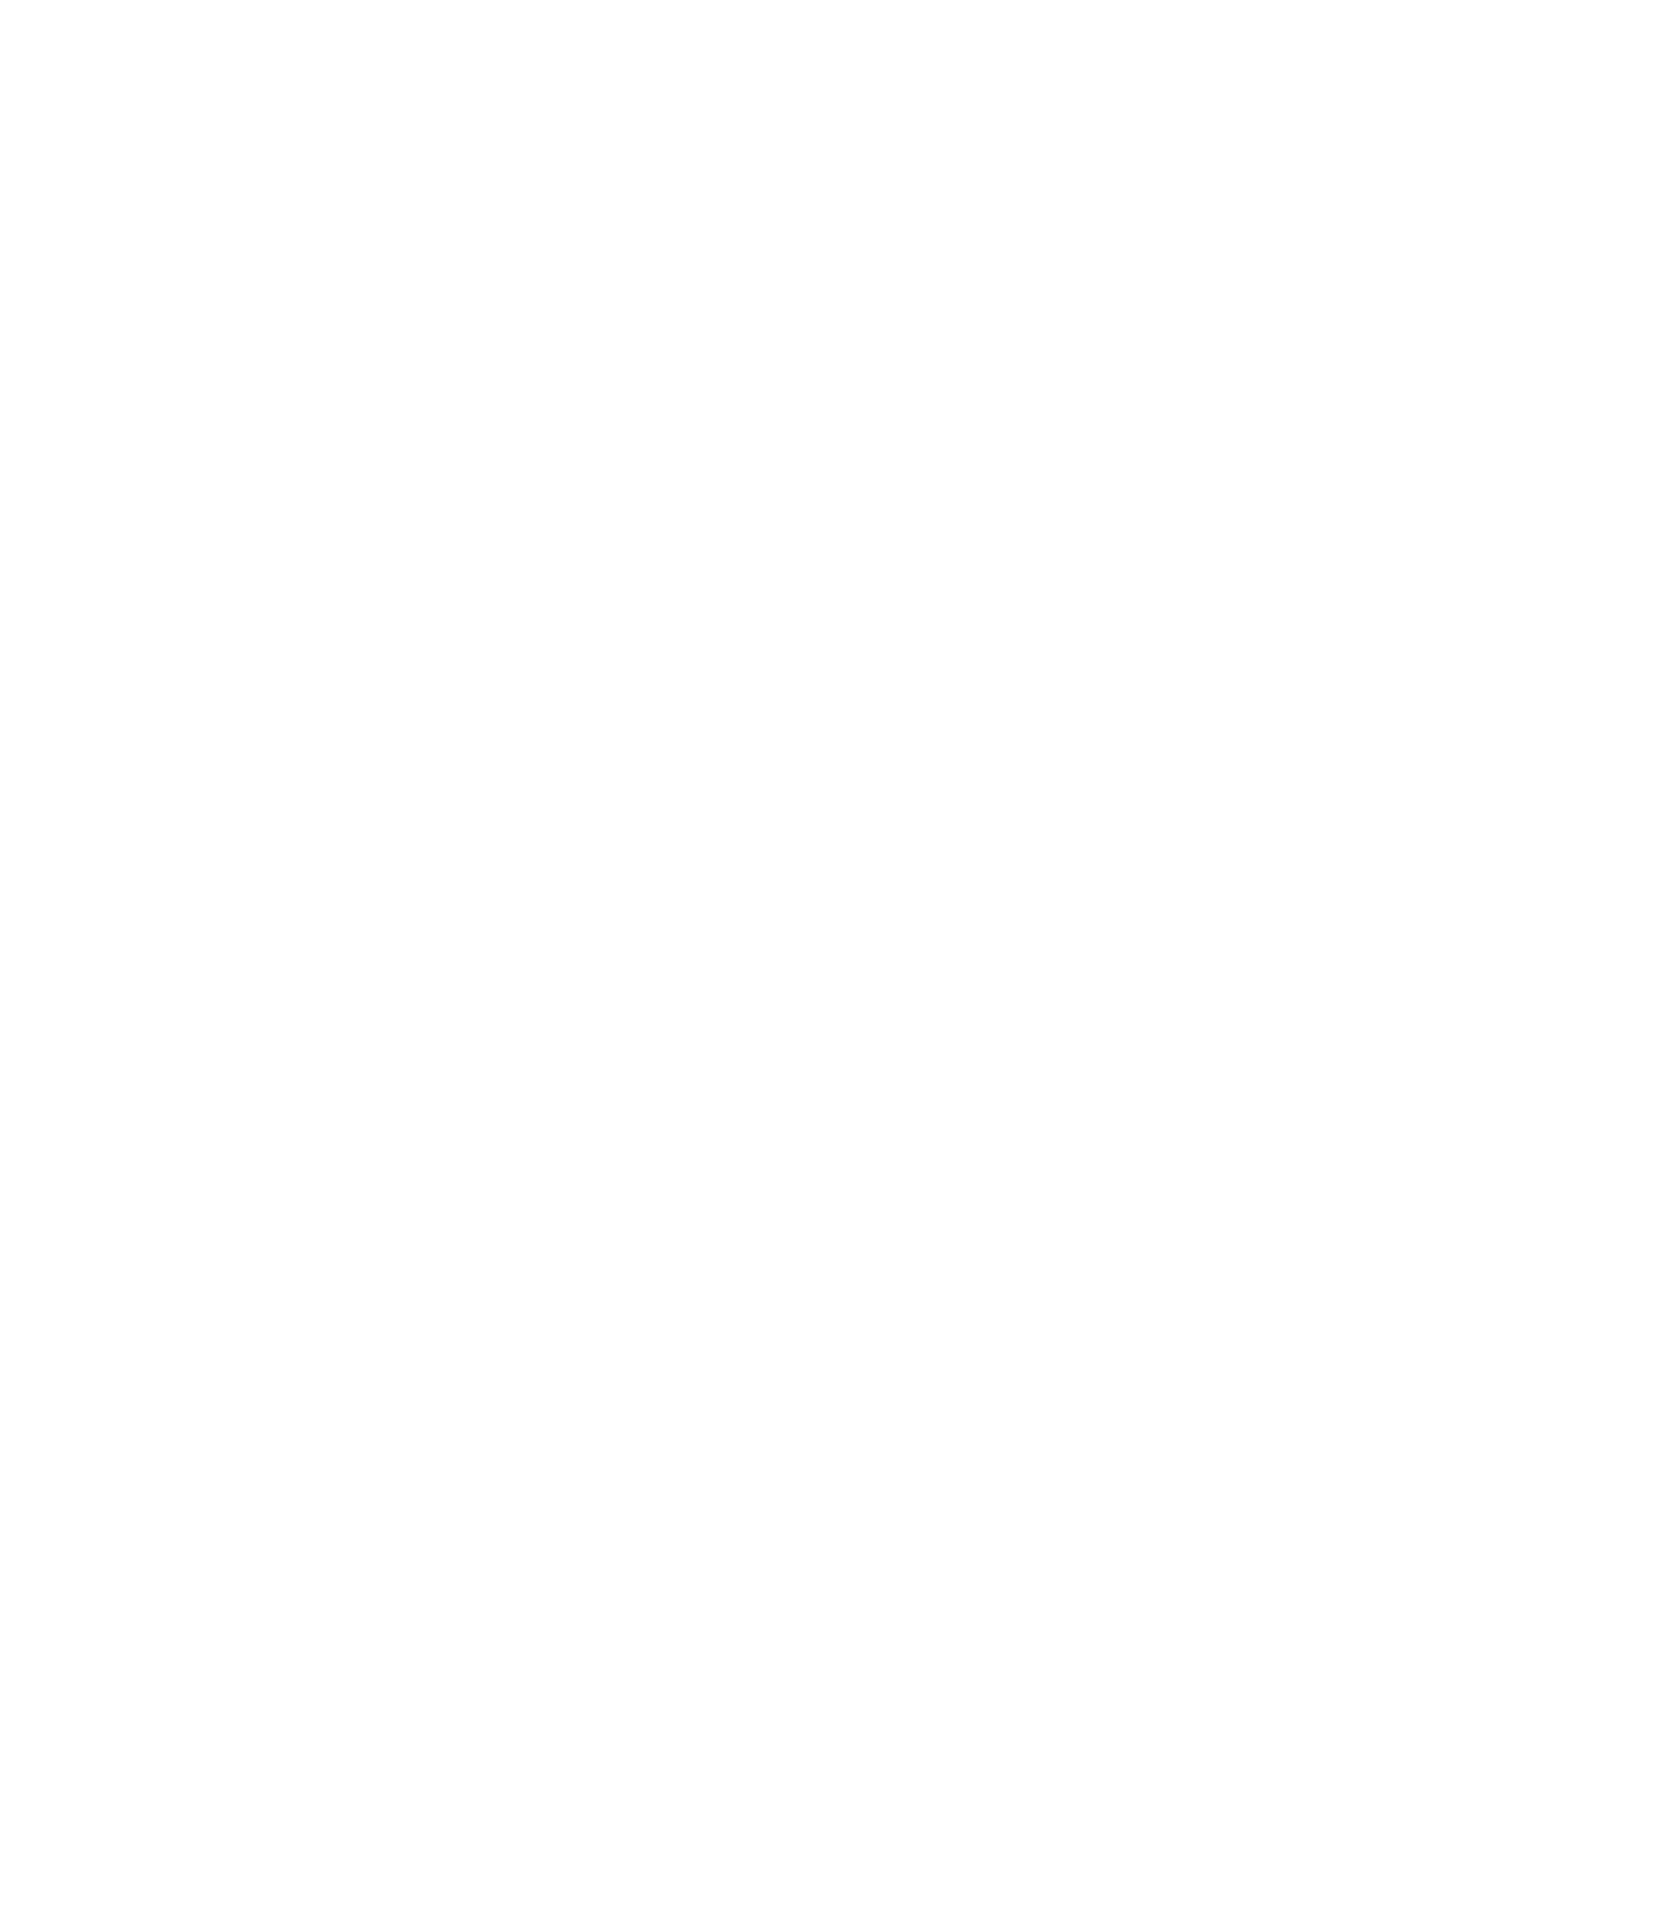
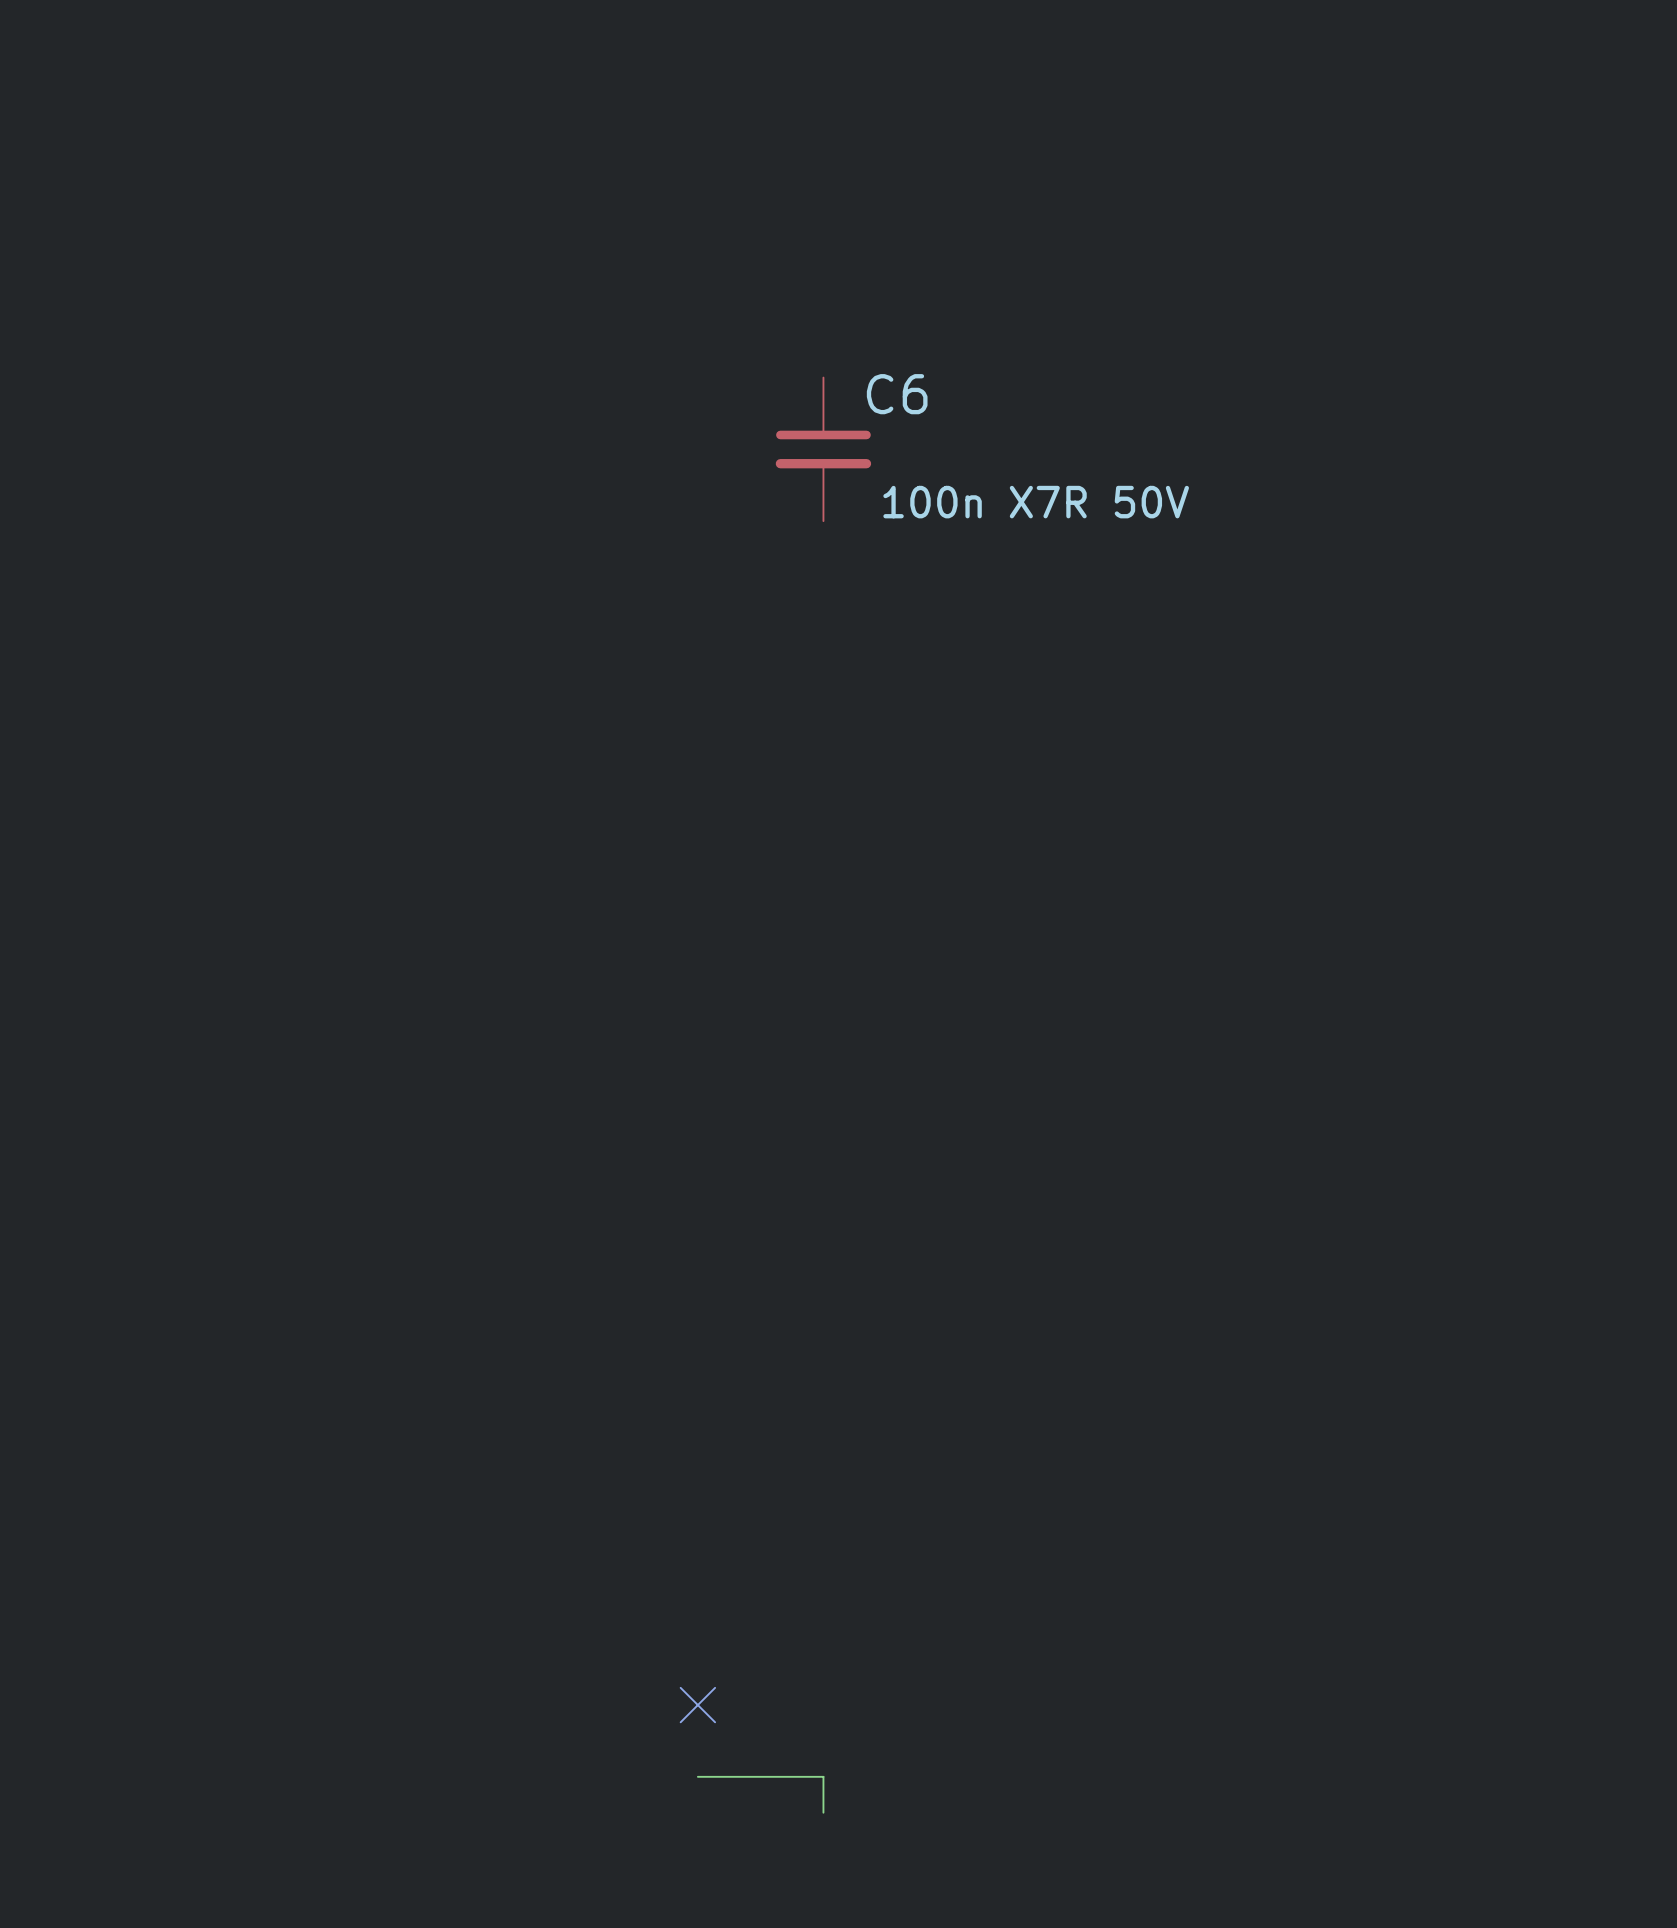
C6: none -> 100n X7R 50V (823, 449)
no-connect mark: none -> (697, 1705)
wire: none -> (697, 1776) (823, 1776) (823, 1812)

